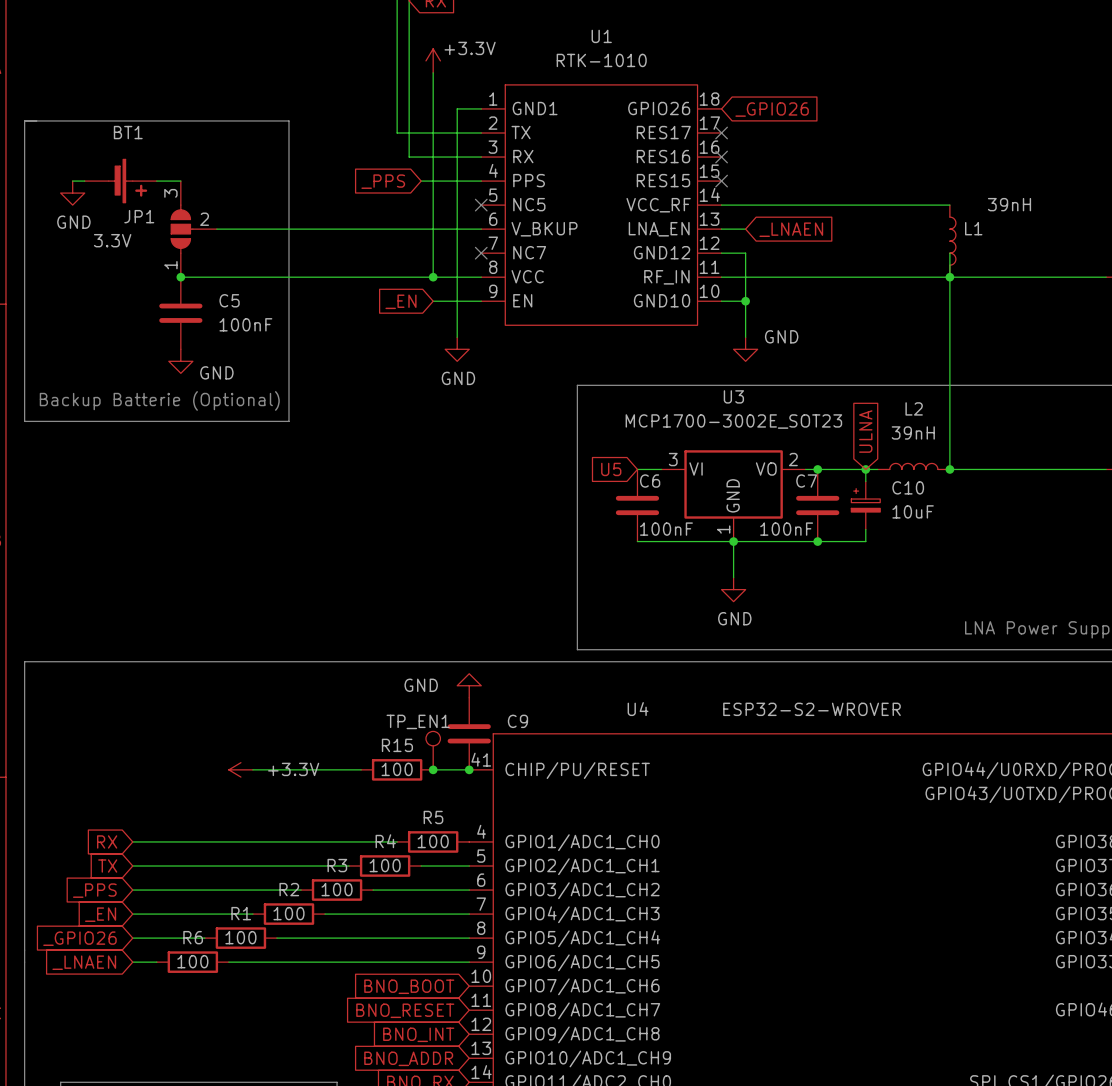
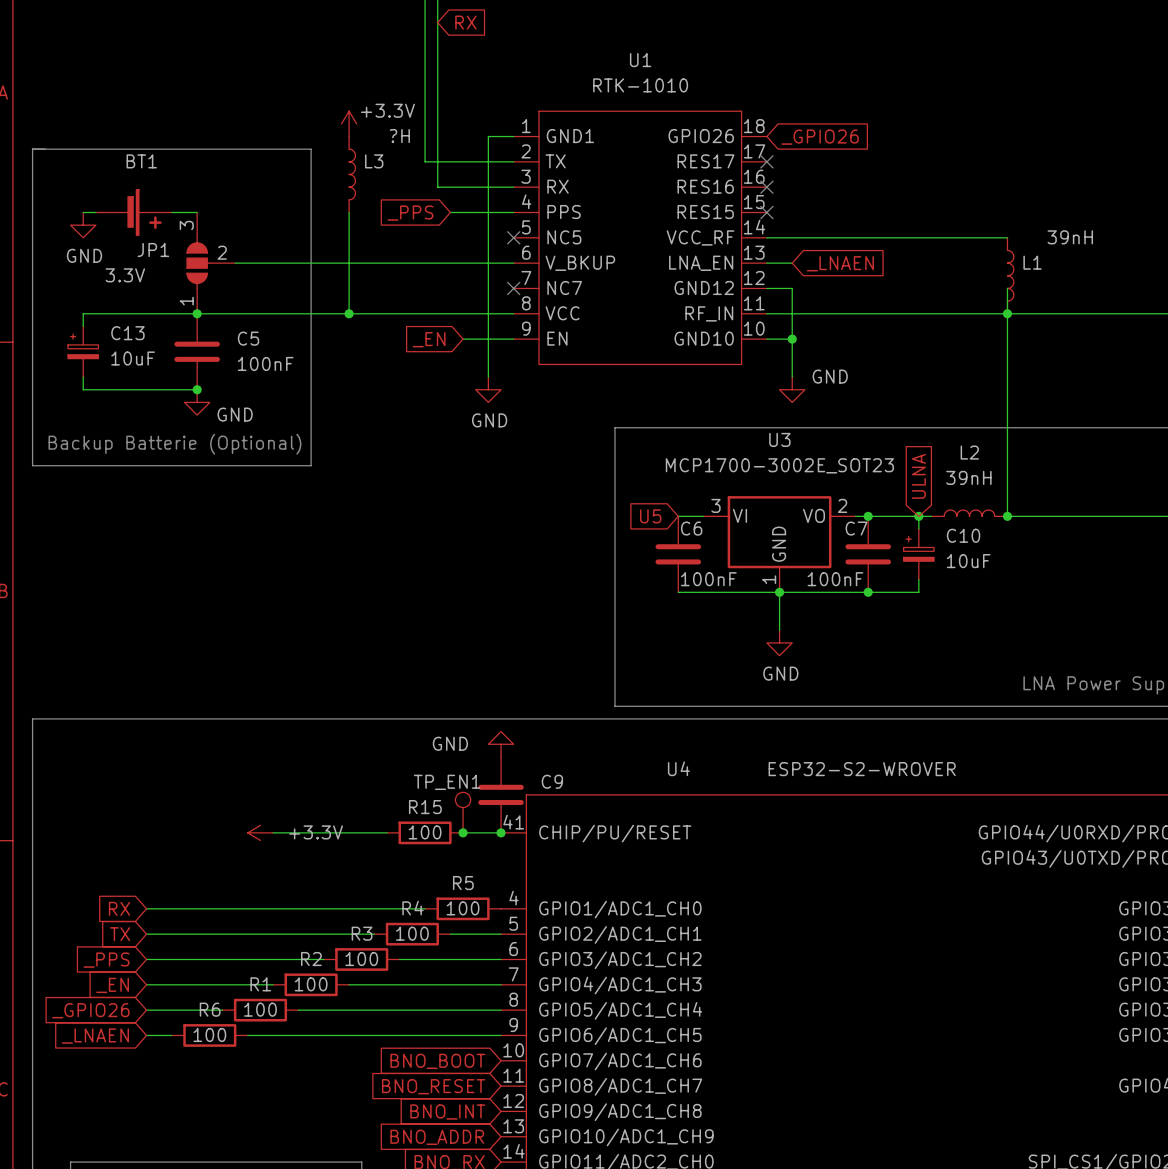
power symbol position: +3.3V (433, 60) -> +3.3V (349, 123)
wire: (433, 72) (433, 277) -> none
L3: none -> ?H (352, 174)
wire: none -> (349, 212) (349, 313)
wire: none -> (197, 313) (83, 313) (83, 326)
junction: none -> (349, 313)
junction: (433, 277) -> none
C13: none -> 10uF (83, 351)
wire: none -> (83, 377) (83, 389) (197, 389)
junction: none -> (197, 389)

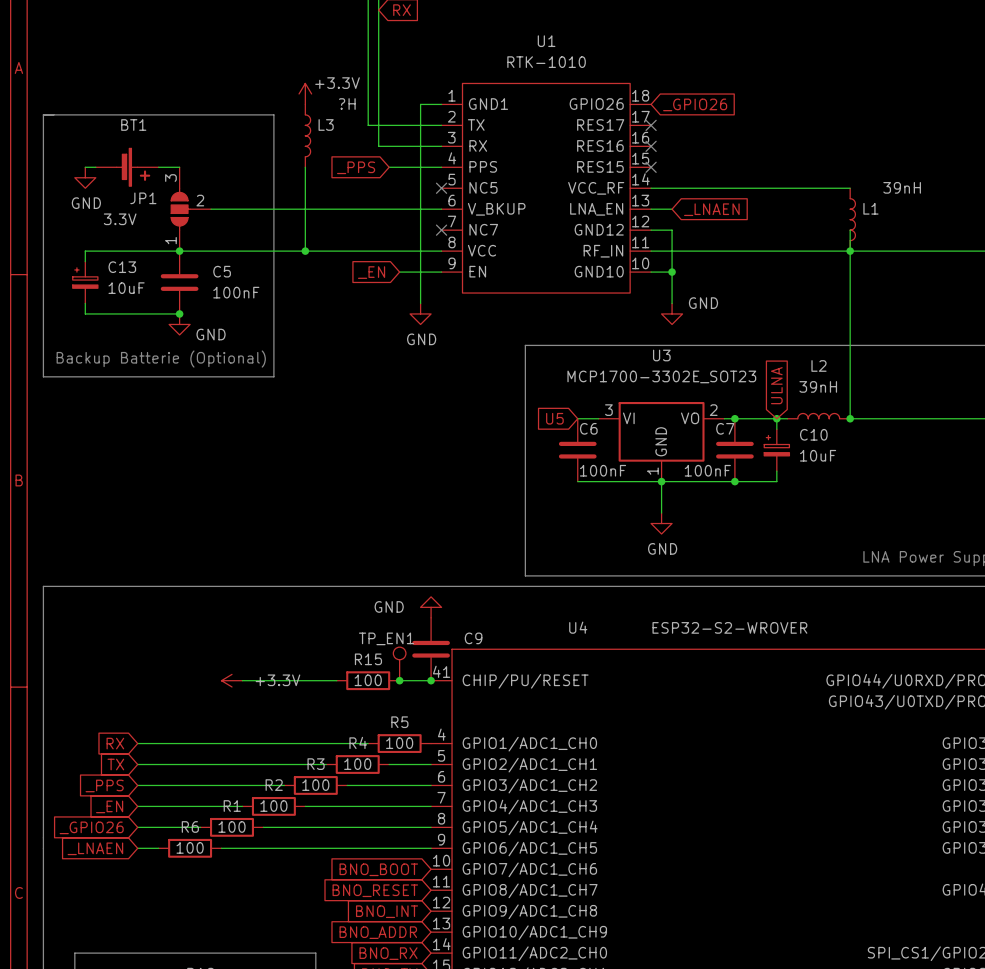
U3 value: MCP1700-3002E_SOT23 (779, 465) -> MCP1700-3302E_SOT23 (661, 376)

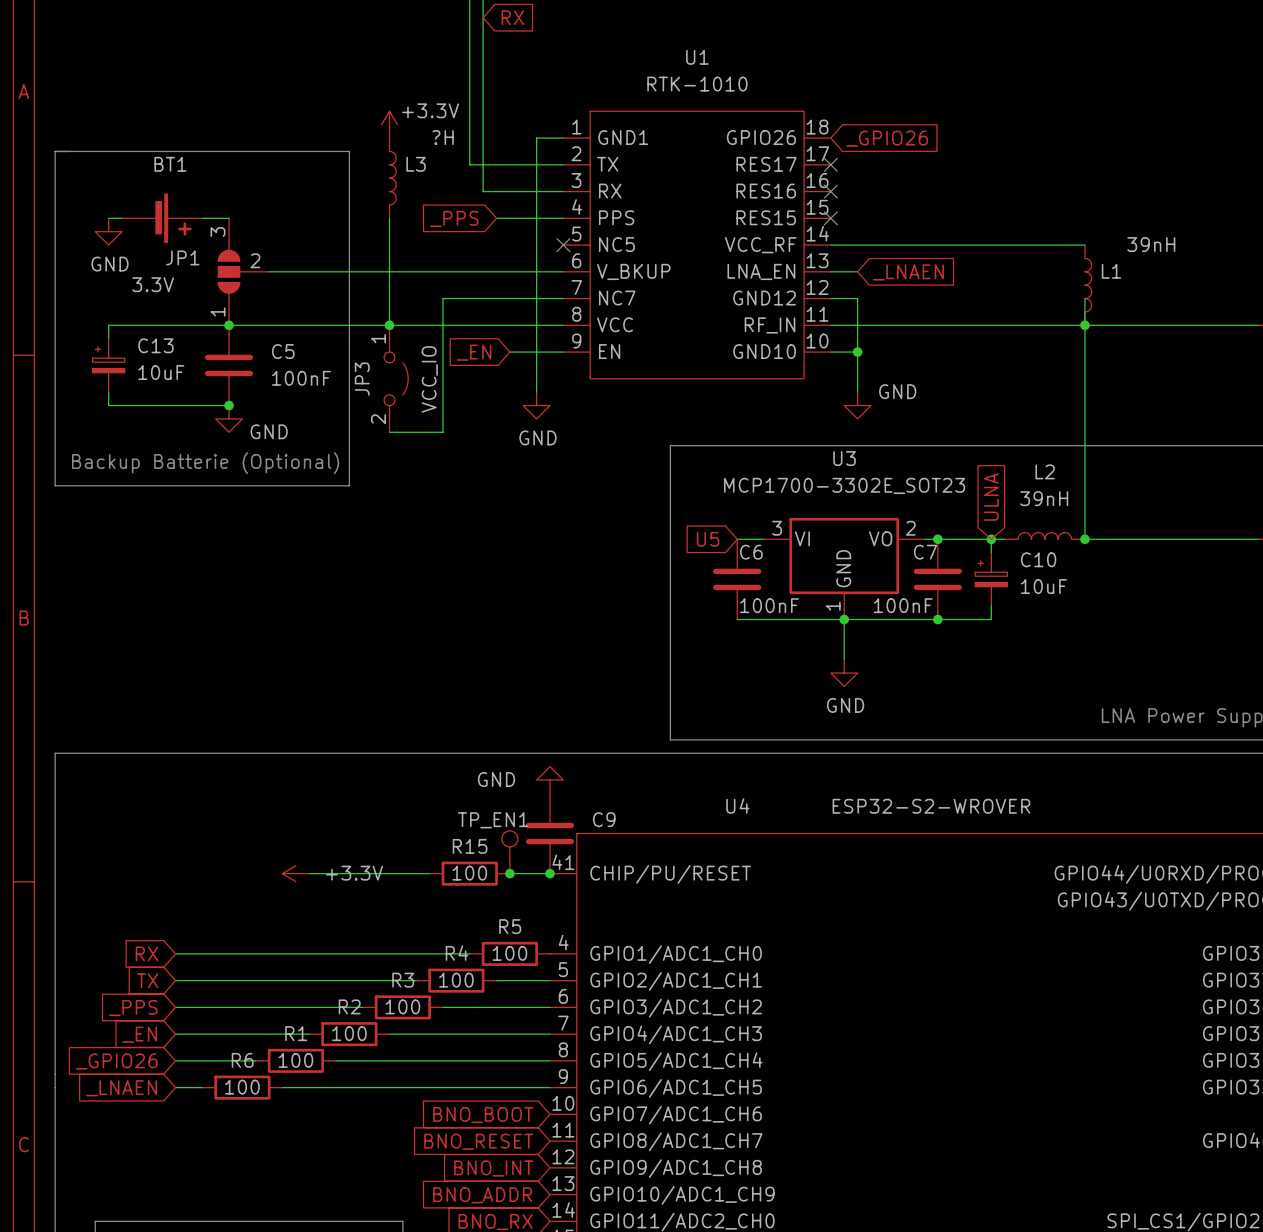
wire: none -> (563, 298) (443, 298) (443, 432) (389, 432)
no-connect mark: (441, 230) -> none
JP3: none -> VCC_IO (396, 378)

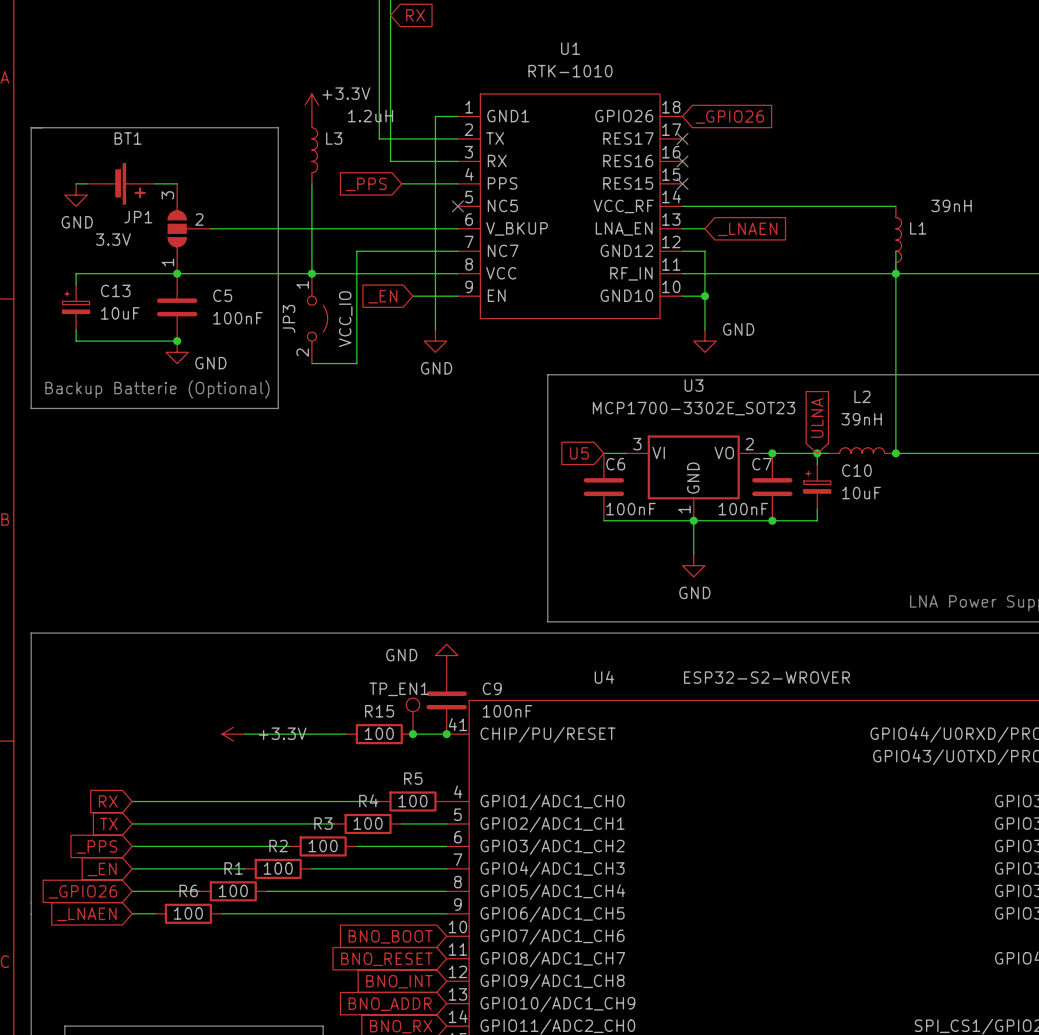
L3 value: ?H (443, 137) -> 1.2uH (370, 116)
C9 value: none -> 100nF (507, 711)

